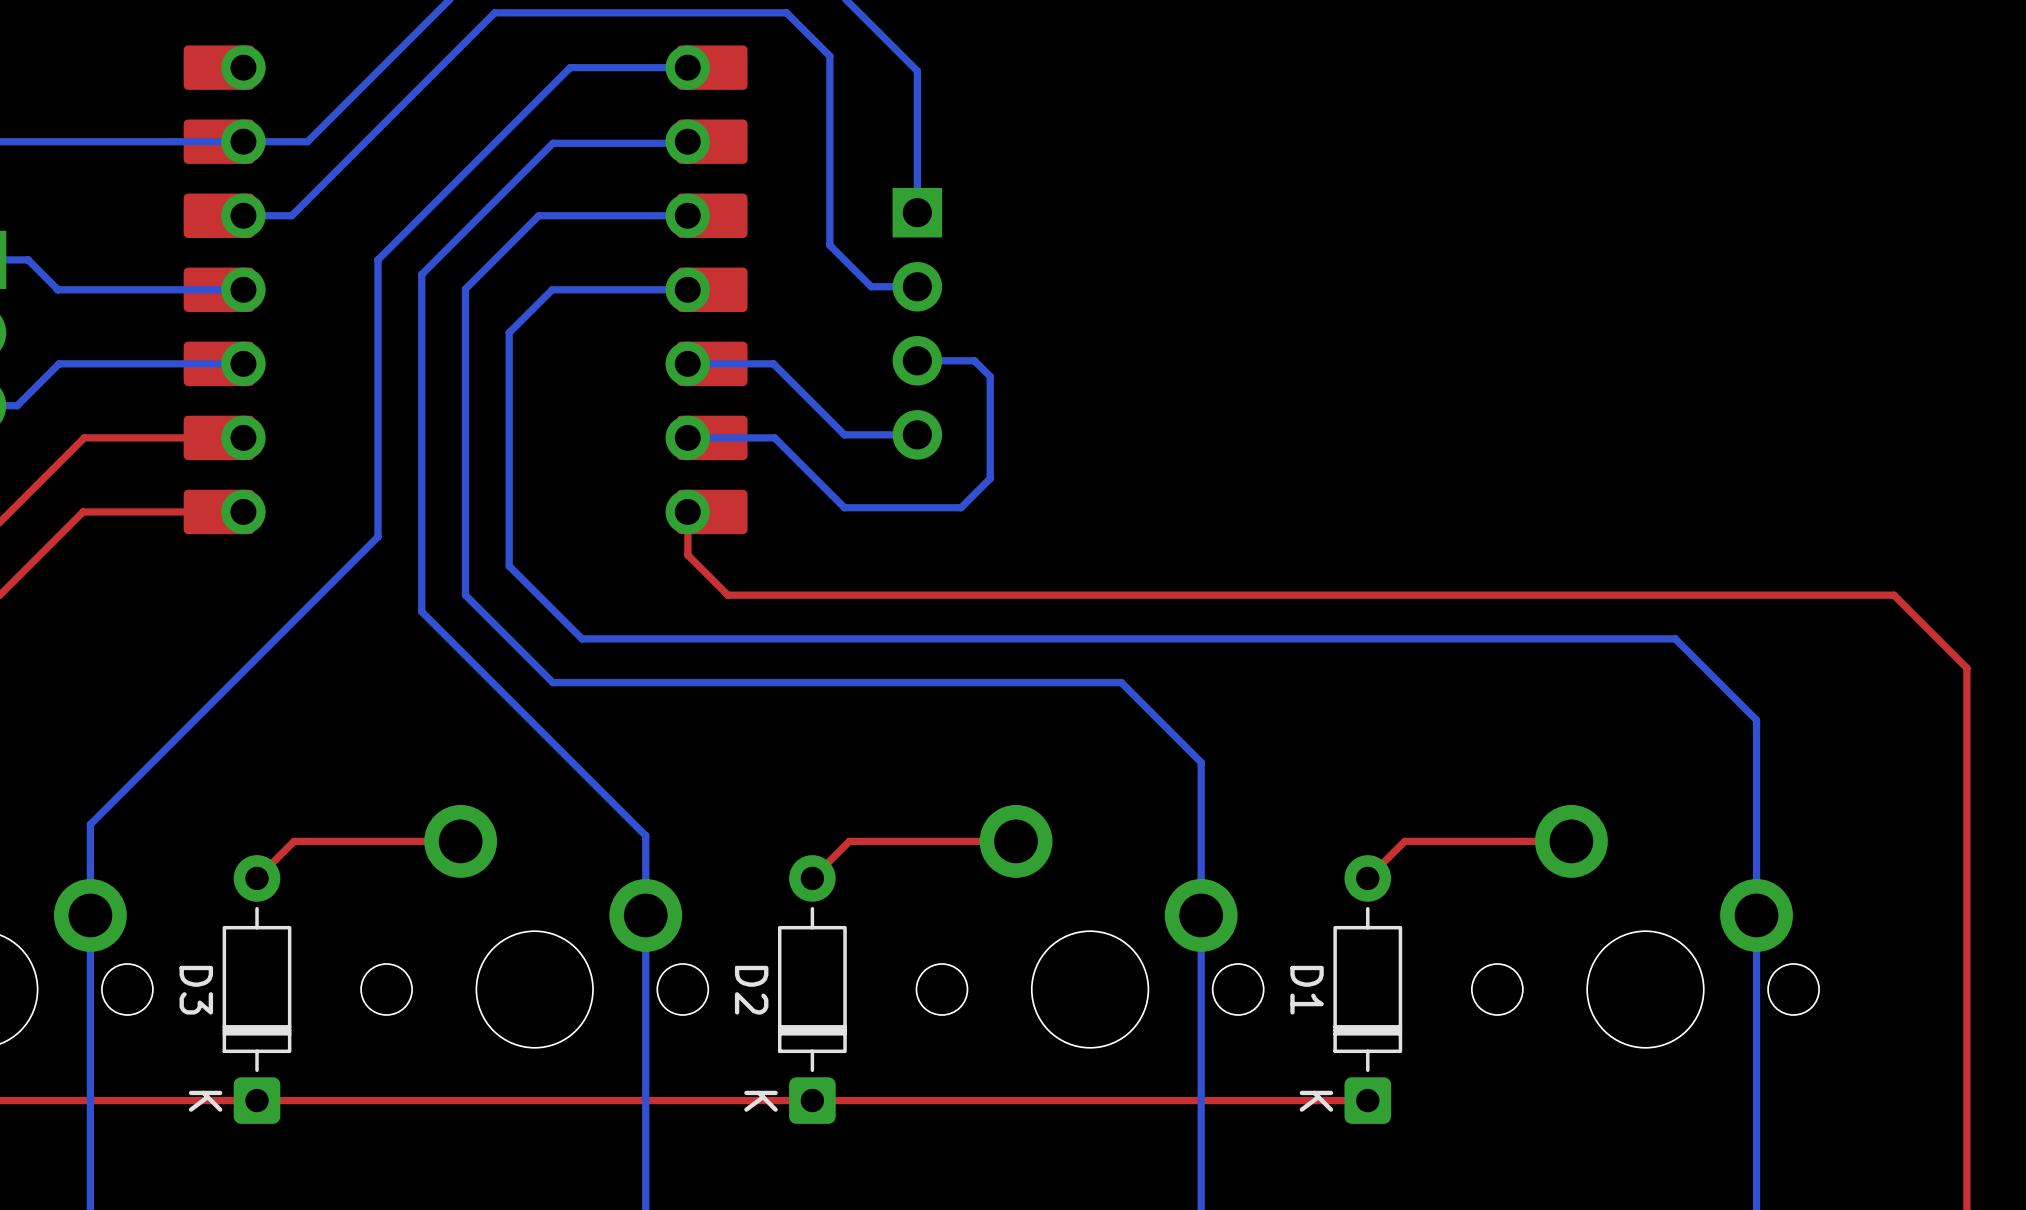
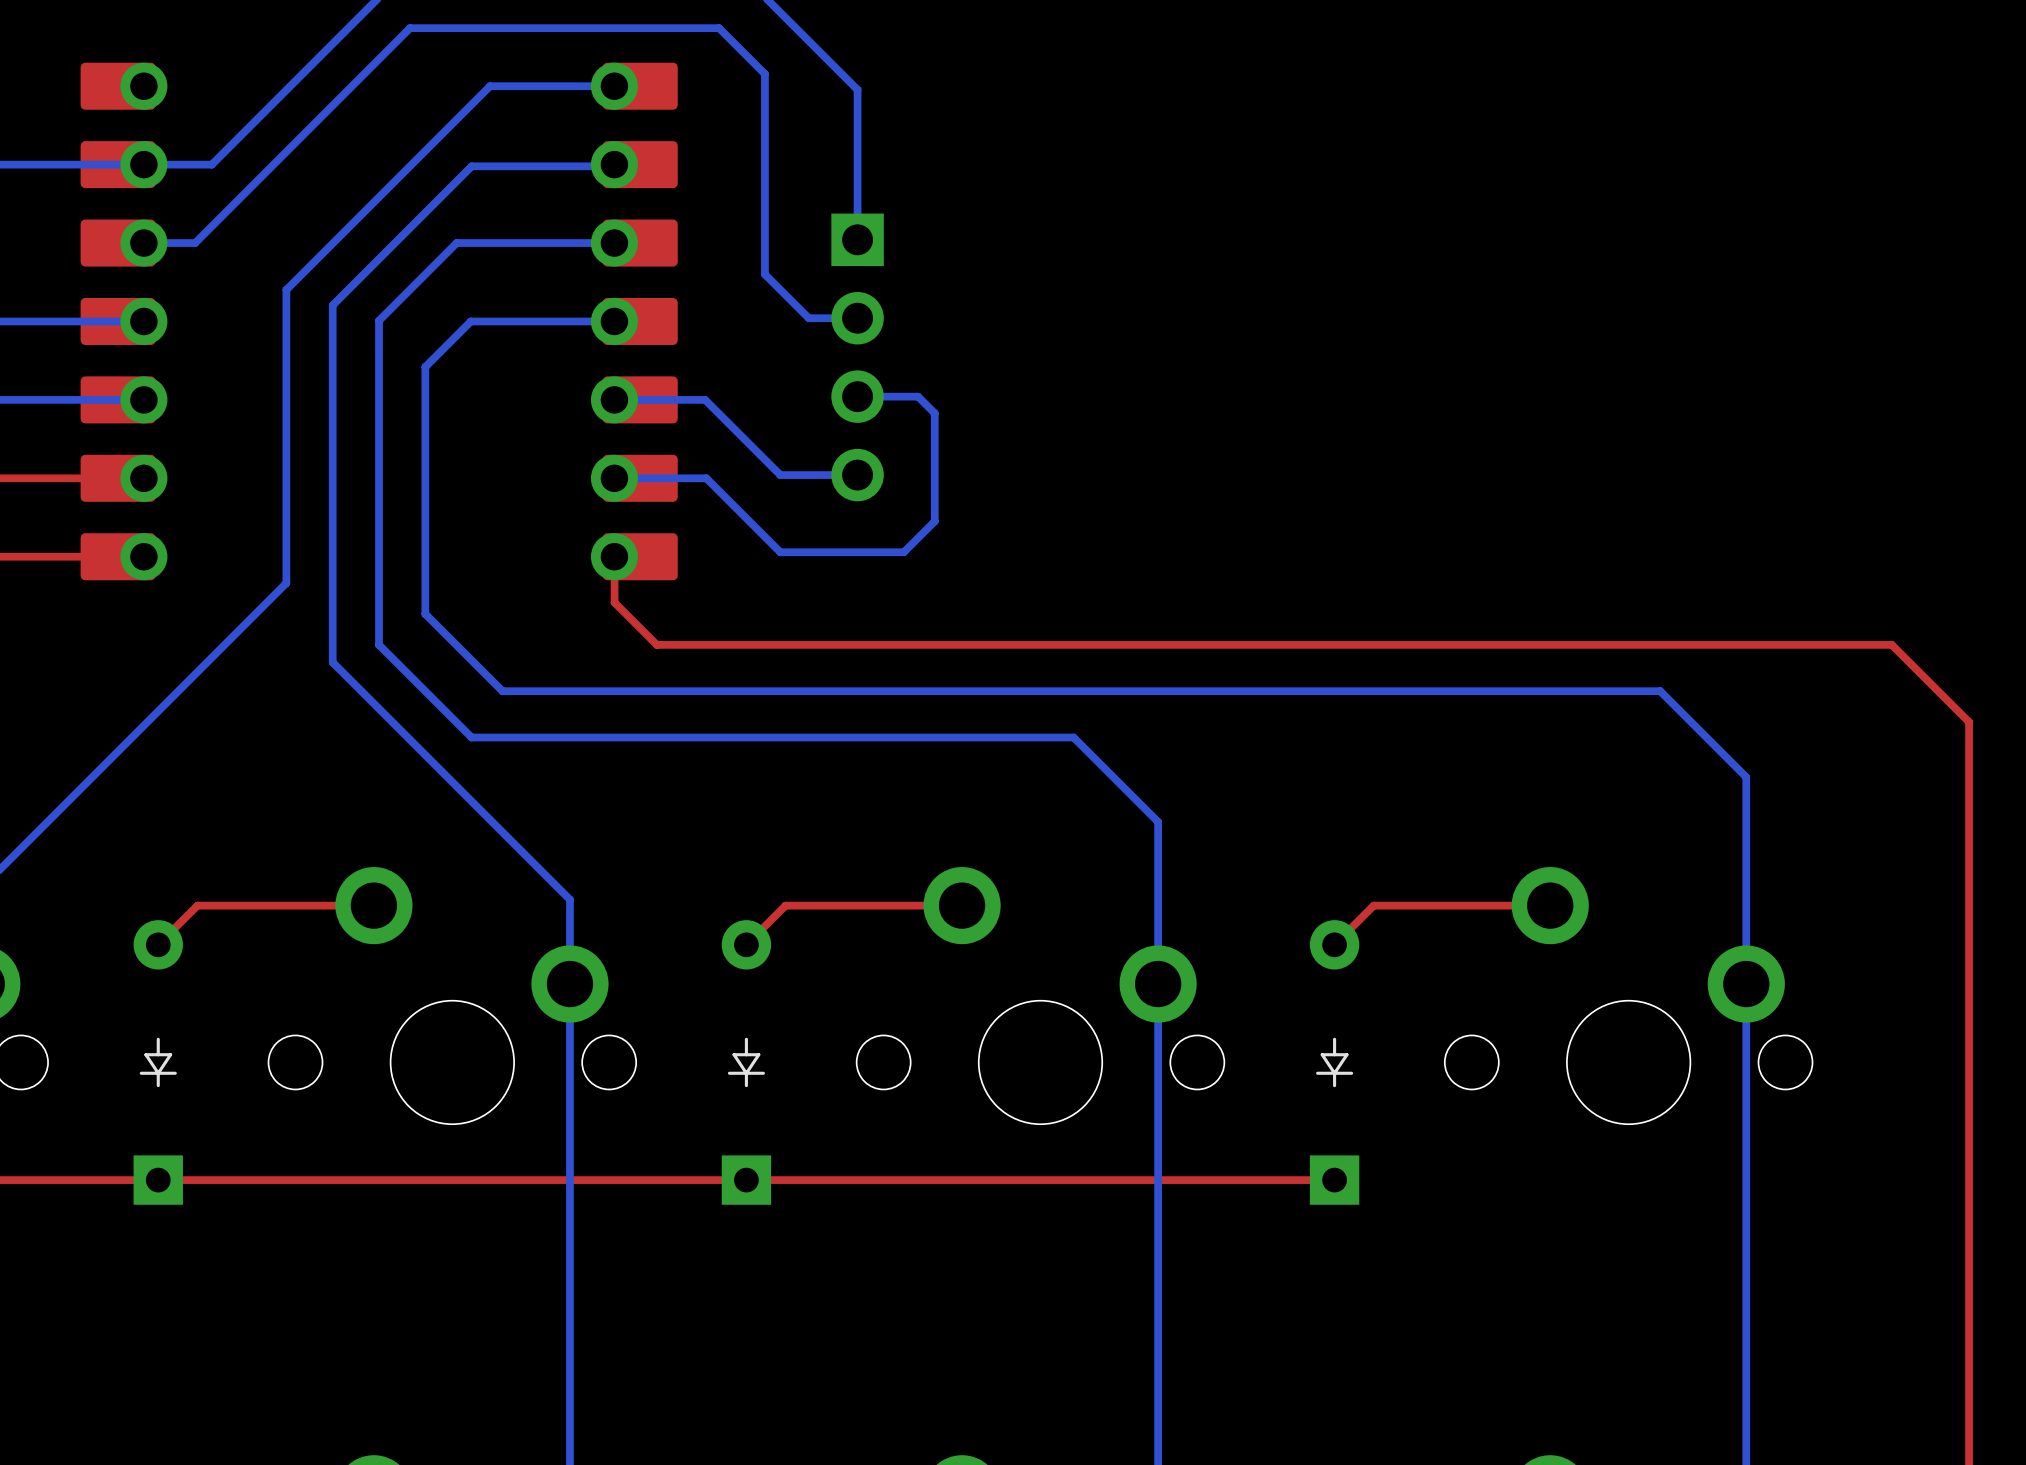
D3: (257, 989) -> none
part: none -> (158, 1062)
D2: (812, 989) -> none
part: none -> (746, 1062)
D1: (1367, 989) -> none
part: none -> (1334, 1062)

